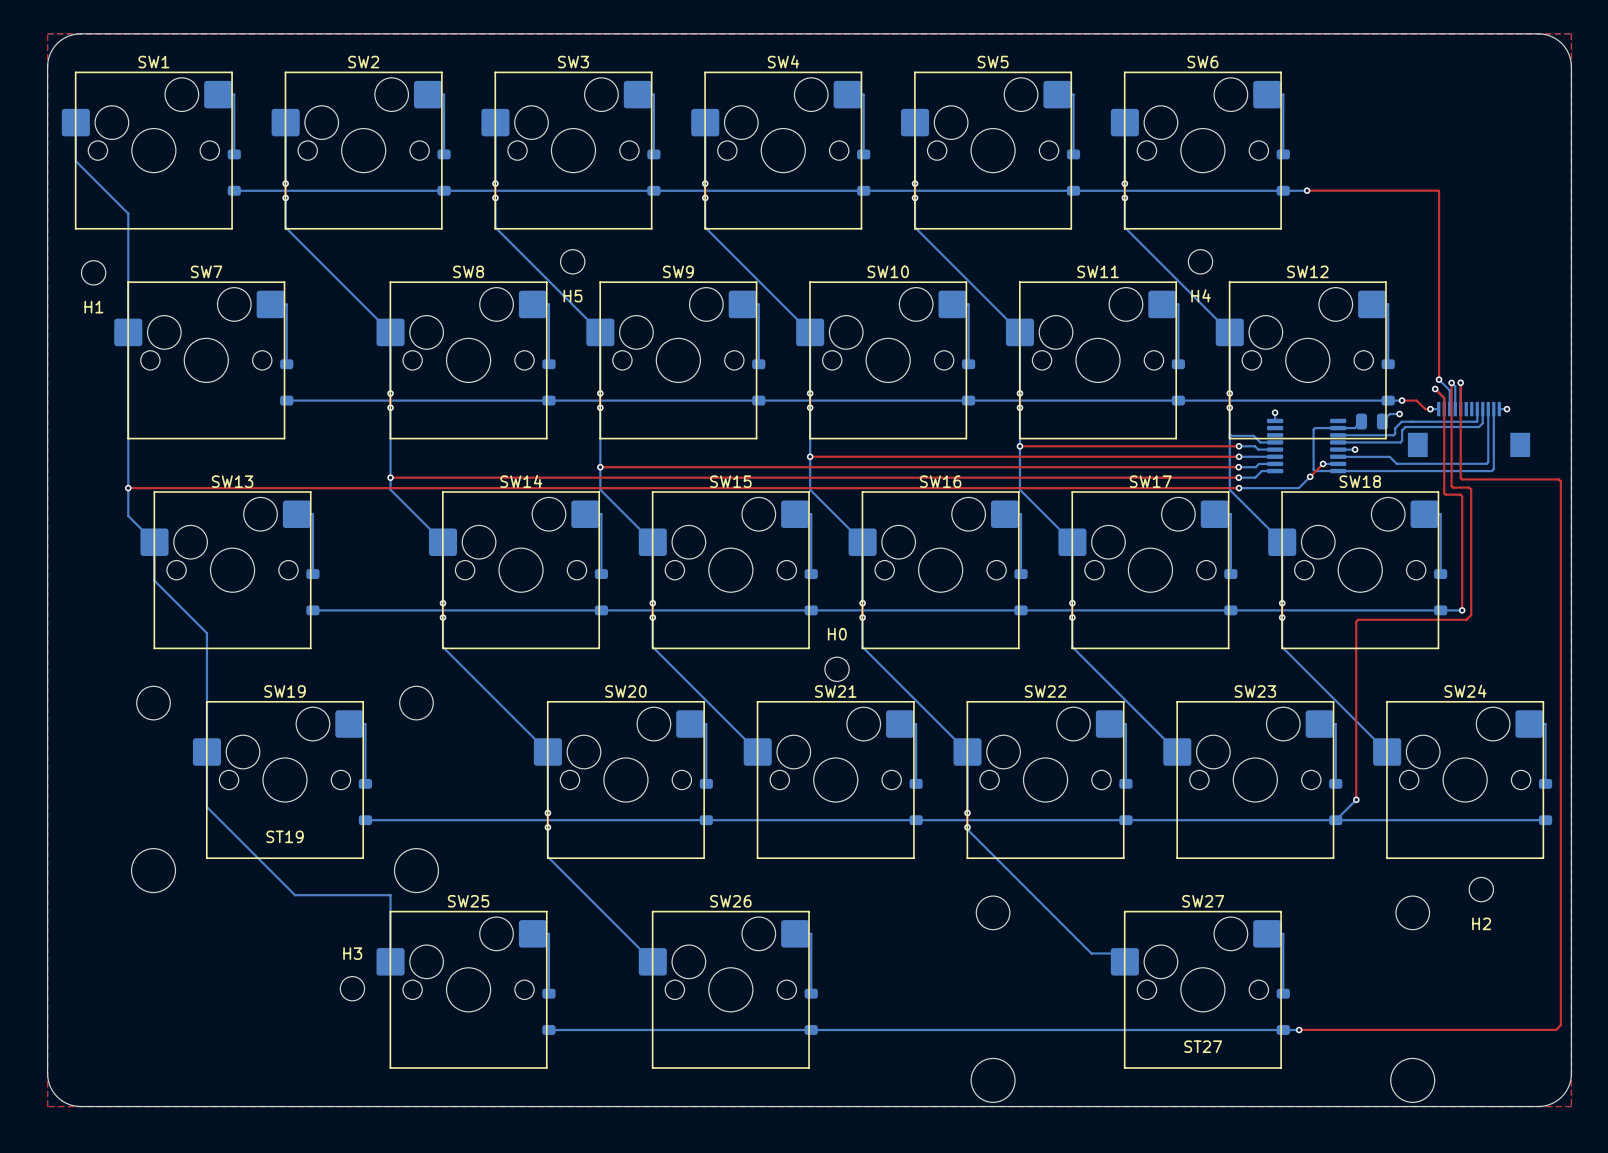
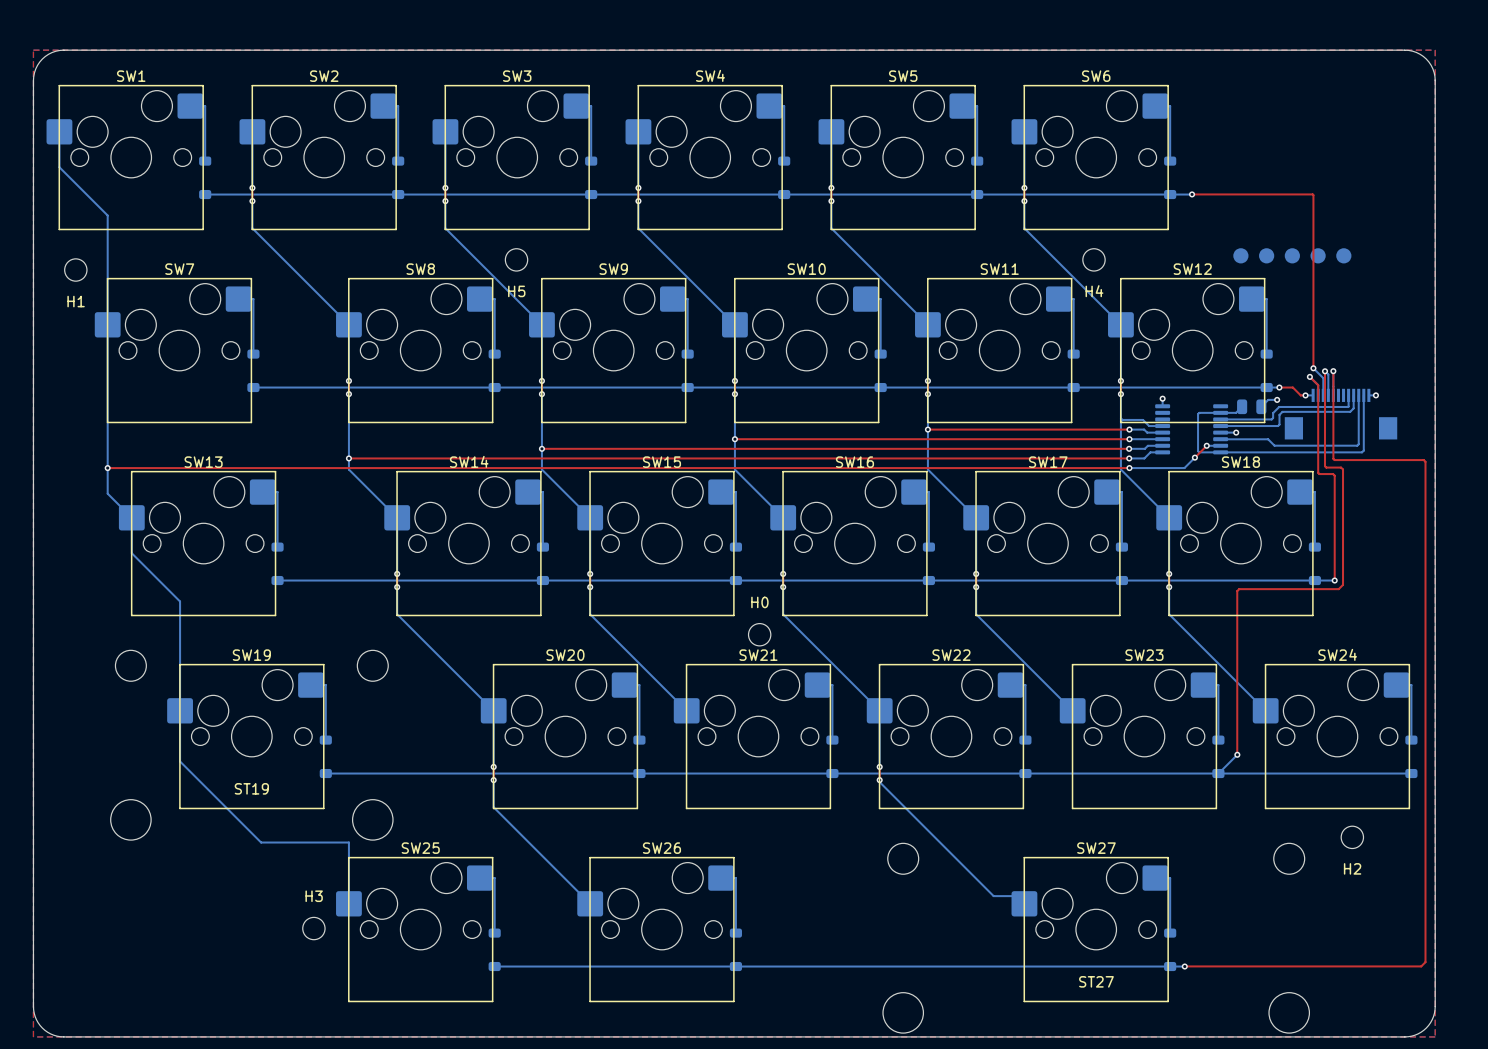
part: none -> (1240, 255)
part: none -> (1266, 255)
part: none -> (1292, 255)
part: none -> (1318, 255)
part: none -> (1343, 255)

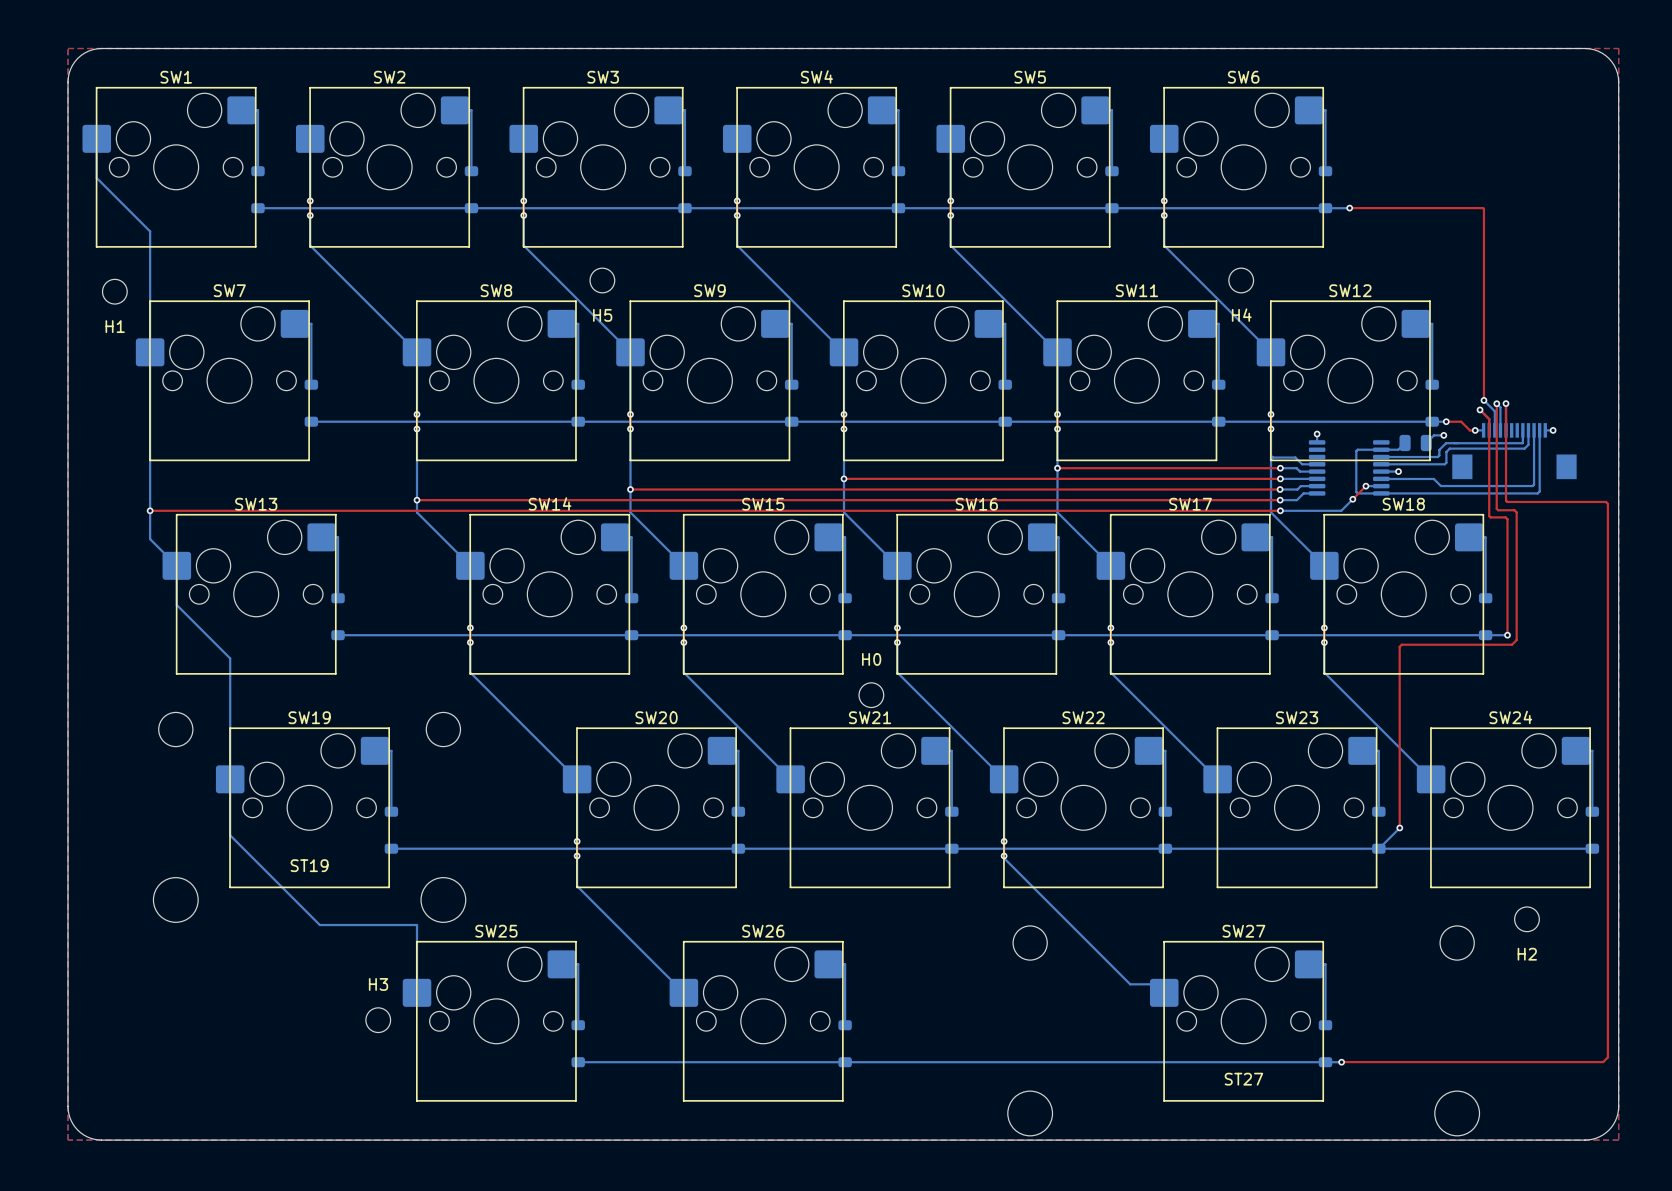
part: (1240, 255) -> none
part: (1266, 255) -> none
part: (1292, 255) -> none
part: (1318, 255) -> none
part: (1343, 255) -> none

